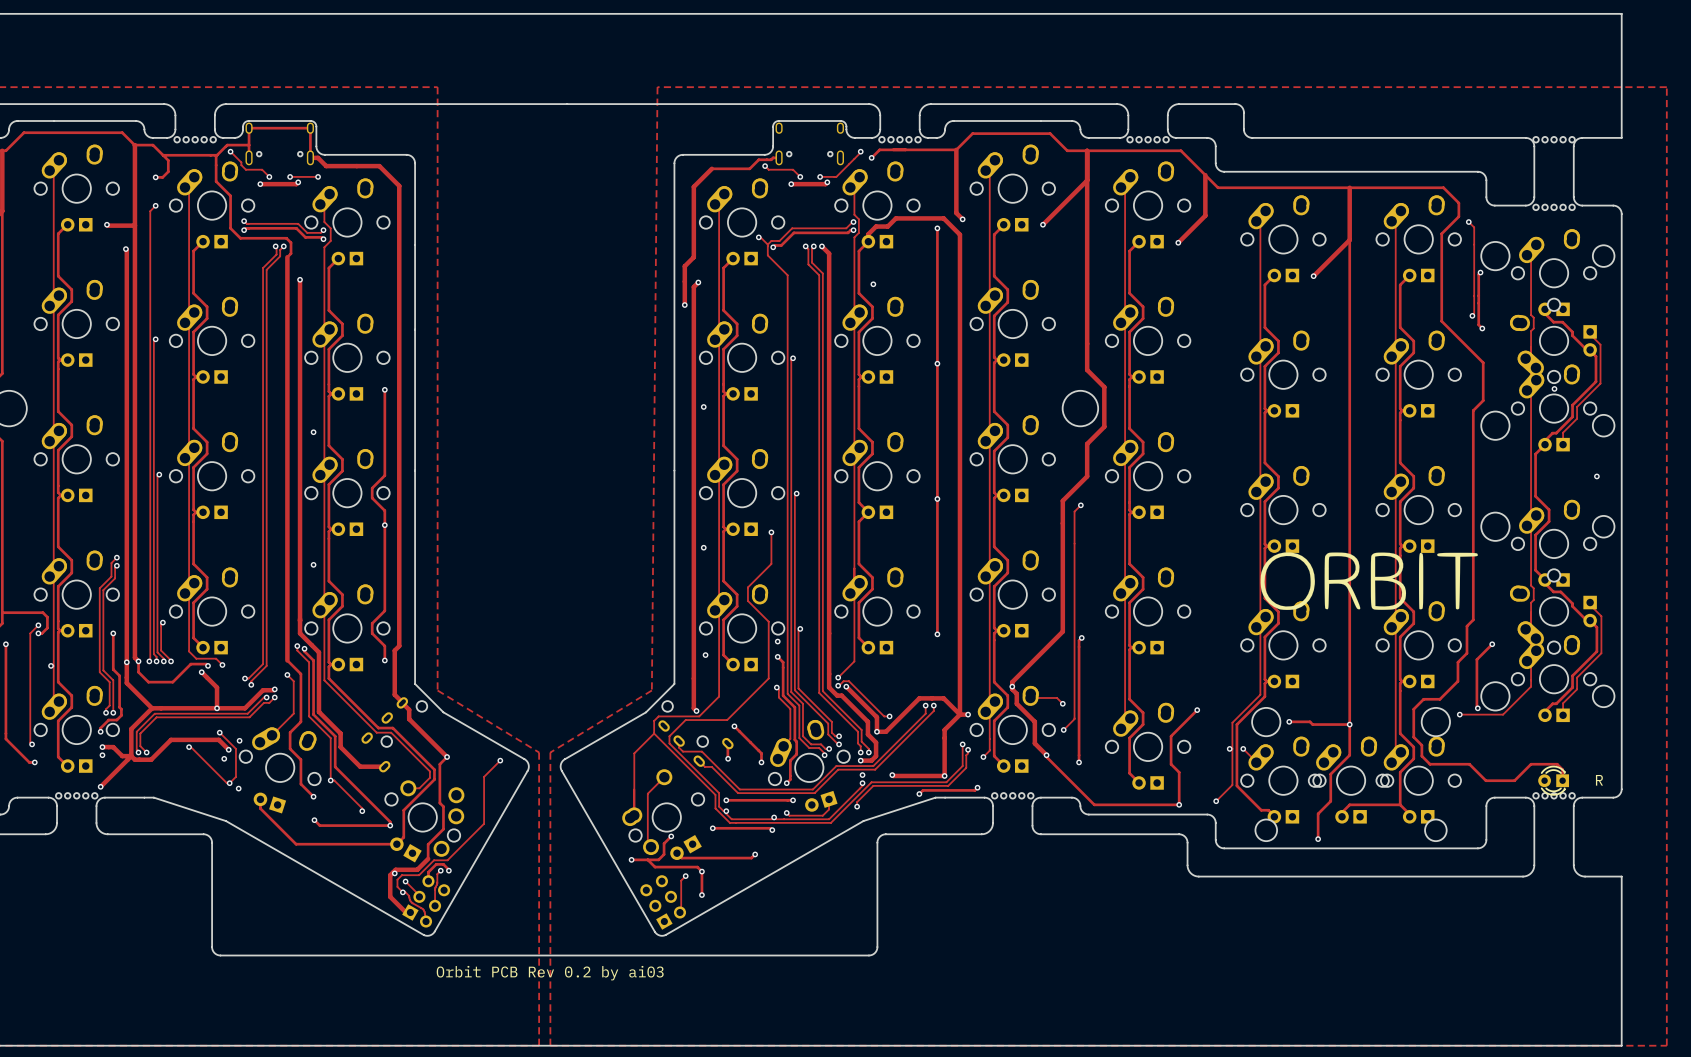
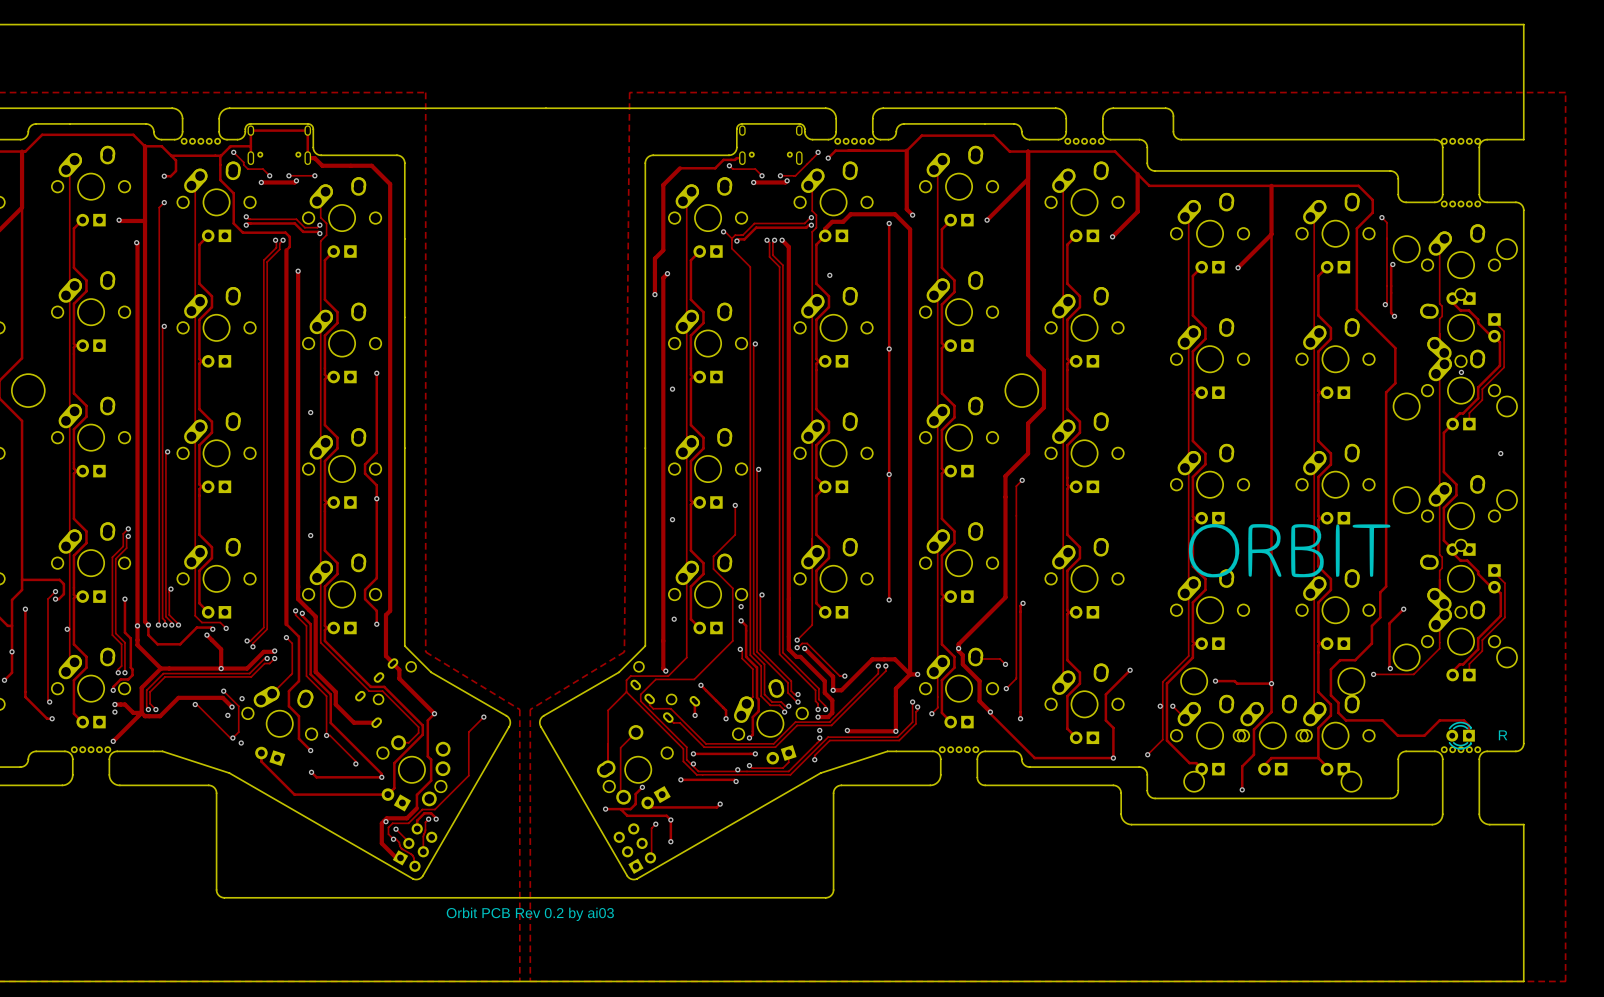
track: (977, 787) (974, 790) (922, 790) (919, 794) -> none
via: (977, 787) -> none
via: (919, 794) -> none

